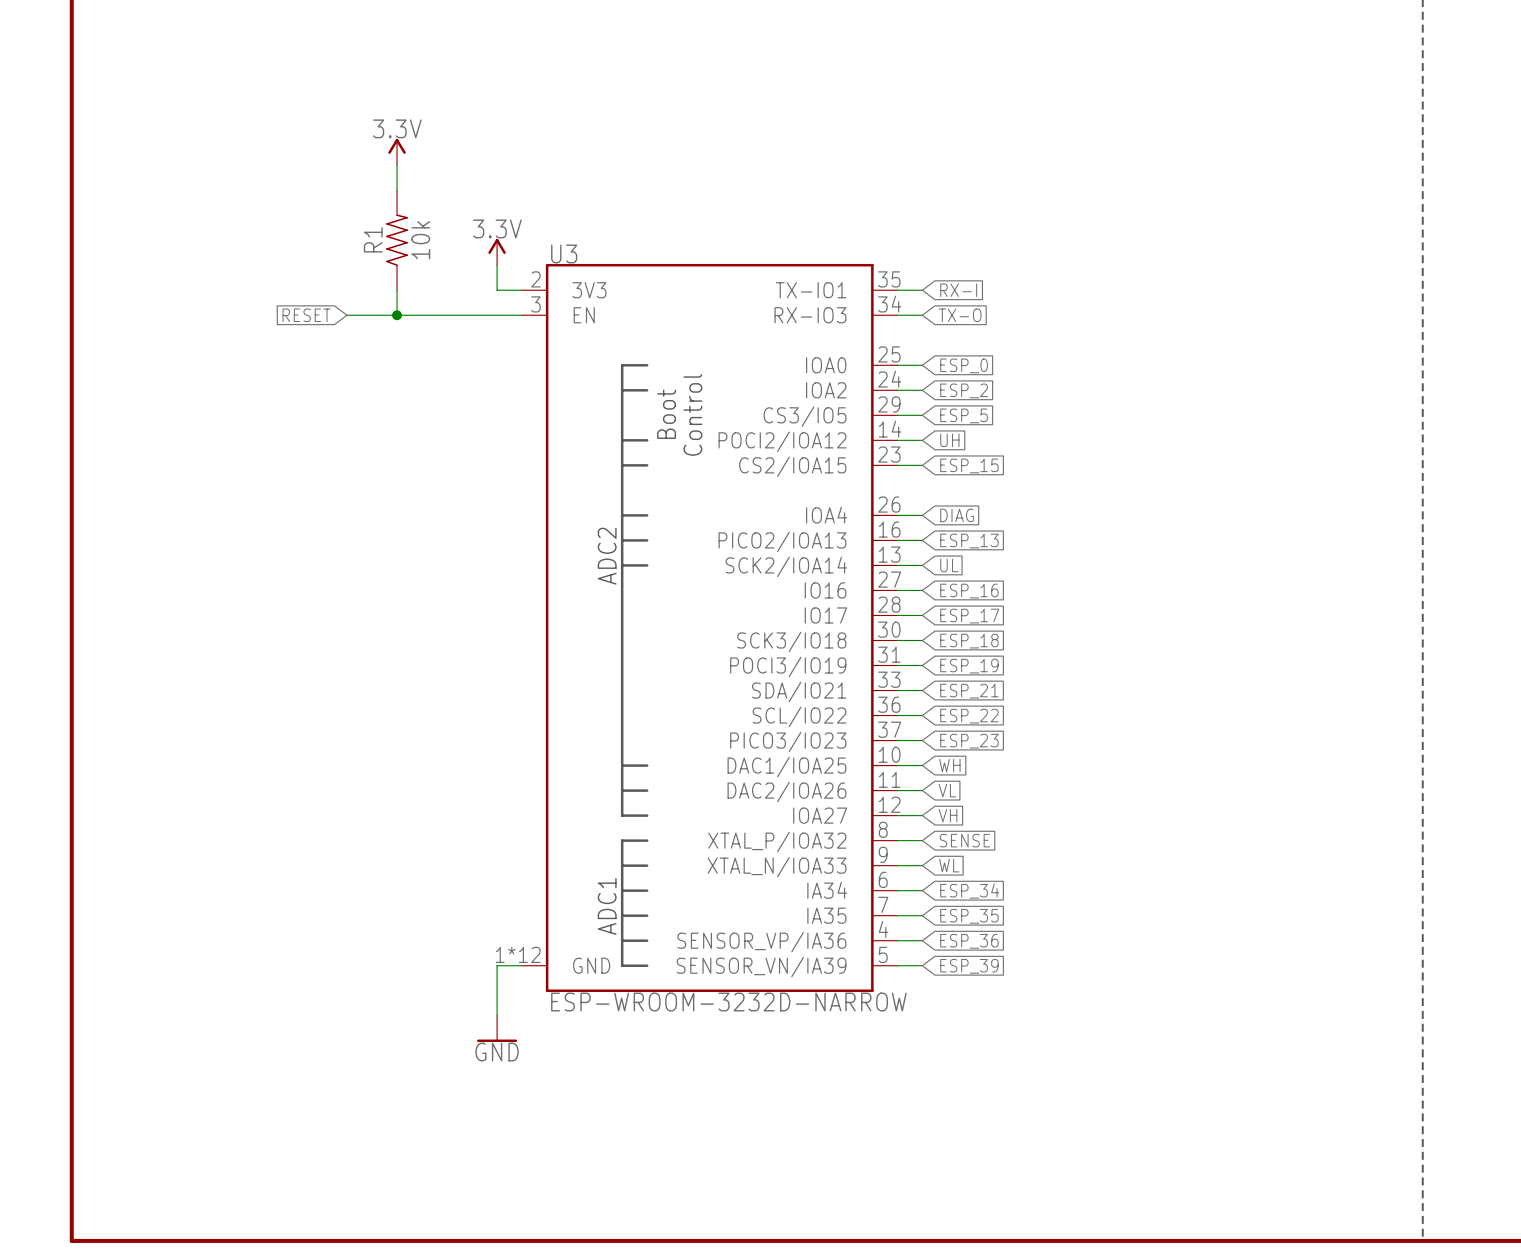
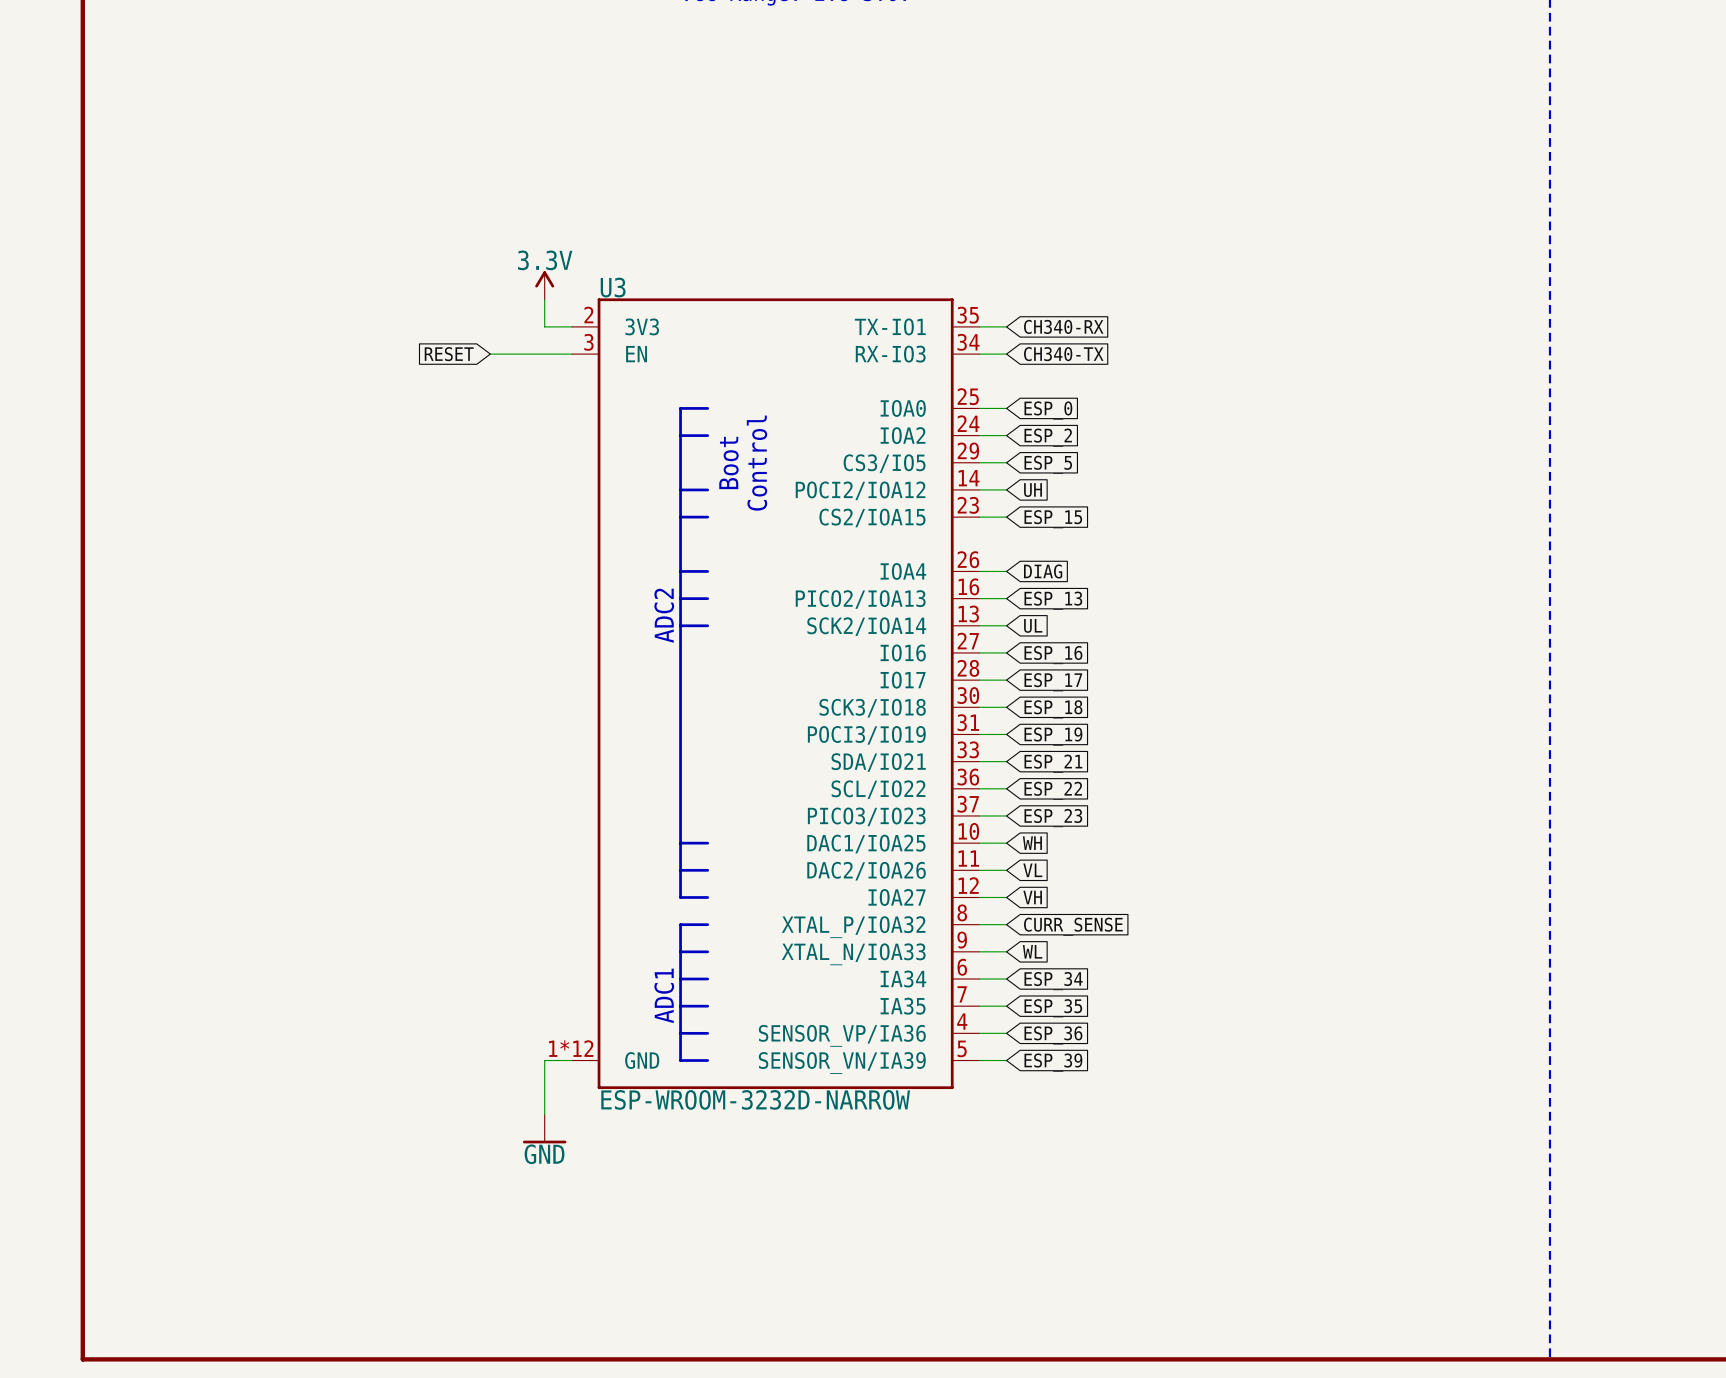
power symbol: 3.3V (397, 152) -> none
wire: (397, 165) (397, 190) -> none
R1: 10k (397, 240) -> none
wire: (397, 290) (397, 315) -> none
global label: RX-I (958, 290) -> CH340-RX (1063, 326)
global label position: RESET (306, 315) -> RESET (449, 354)
wire: (346, 315) (447, 315) -> none
junction: (397, 315) -> none
global label: TX-O (960, 315) -> CH340-TX (1063, 354)
global label: SENSE (964, 840) -> CURR_SENSE (1073, 926)

